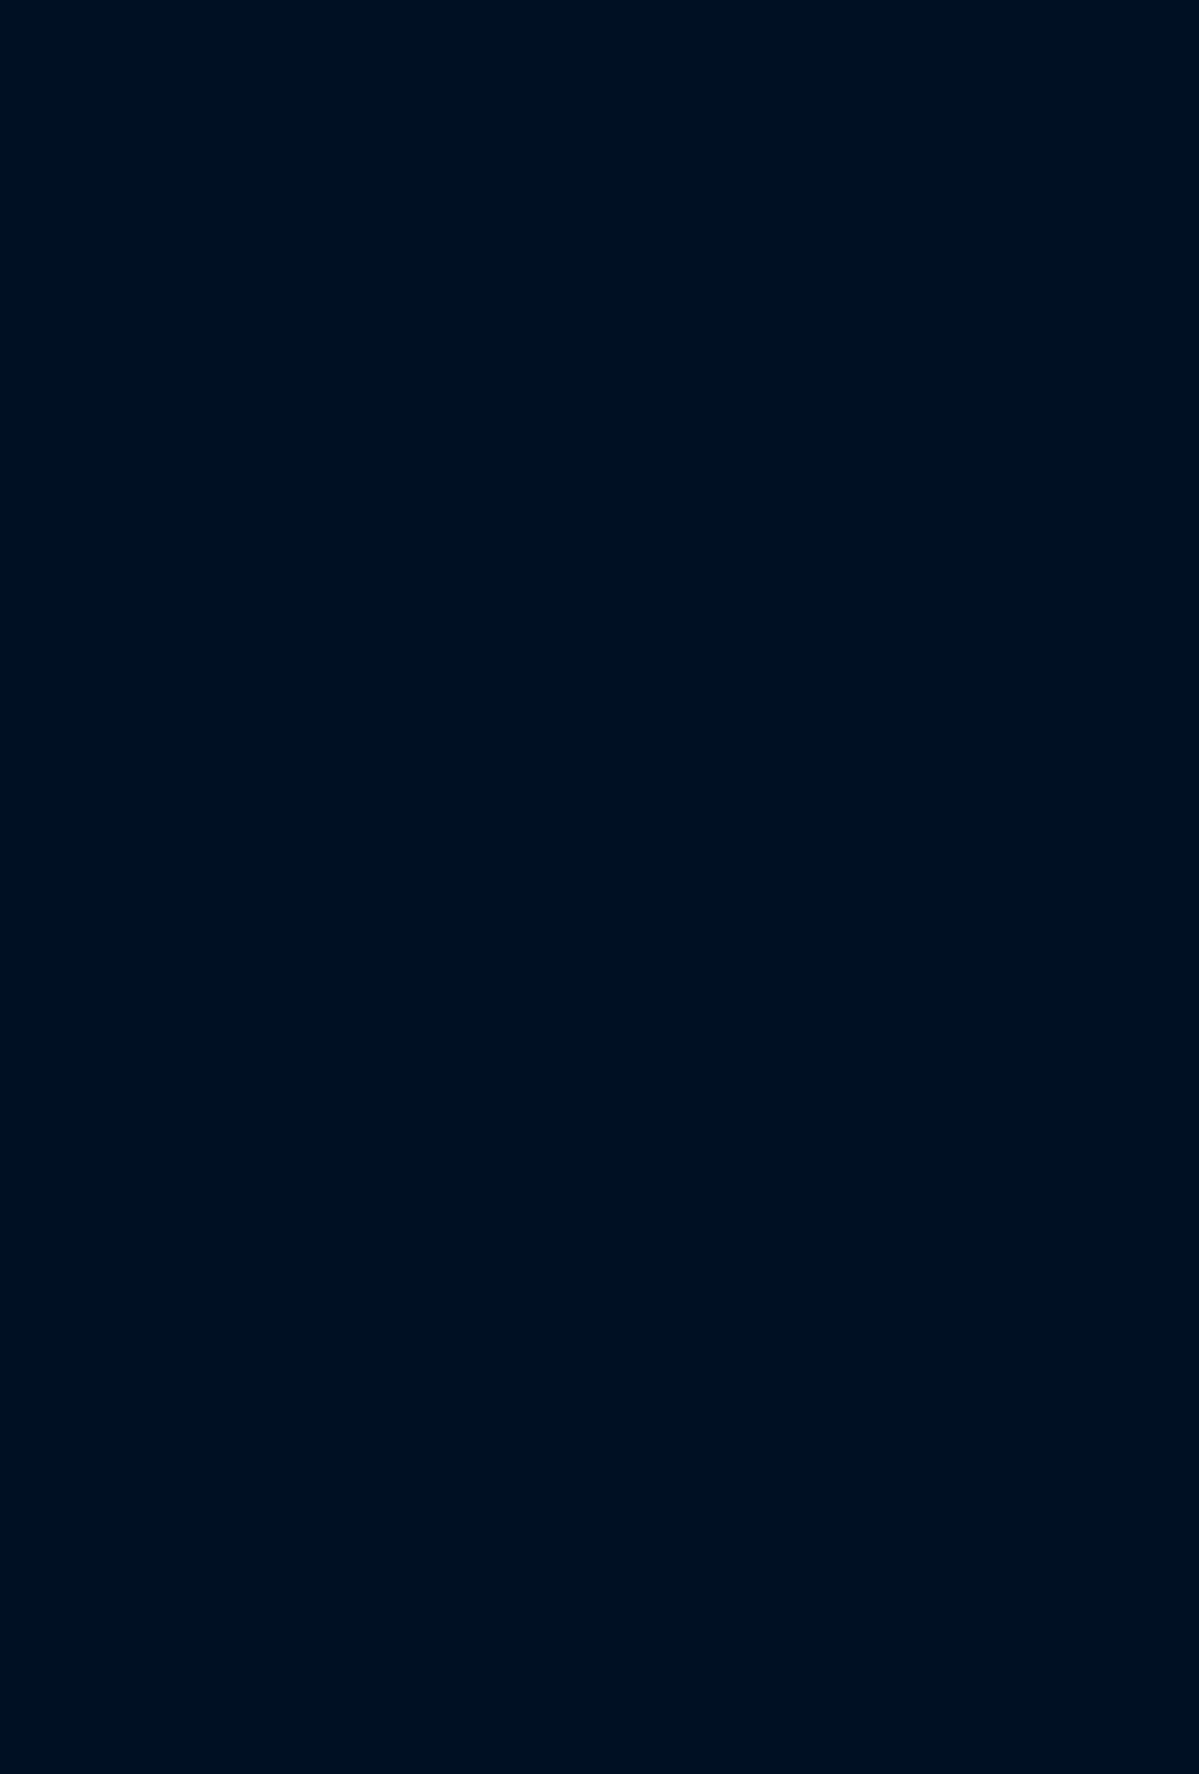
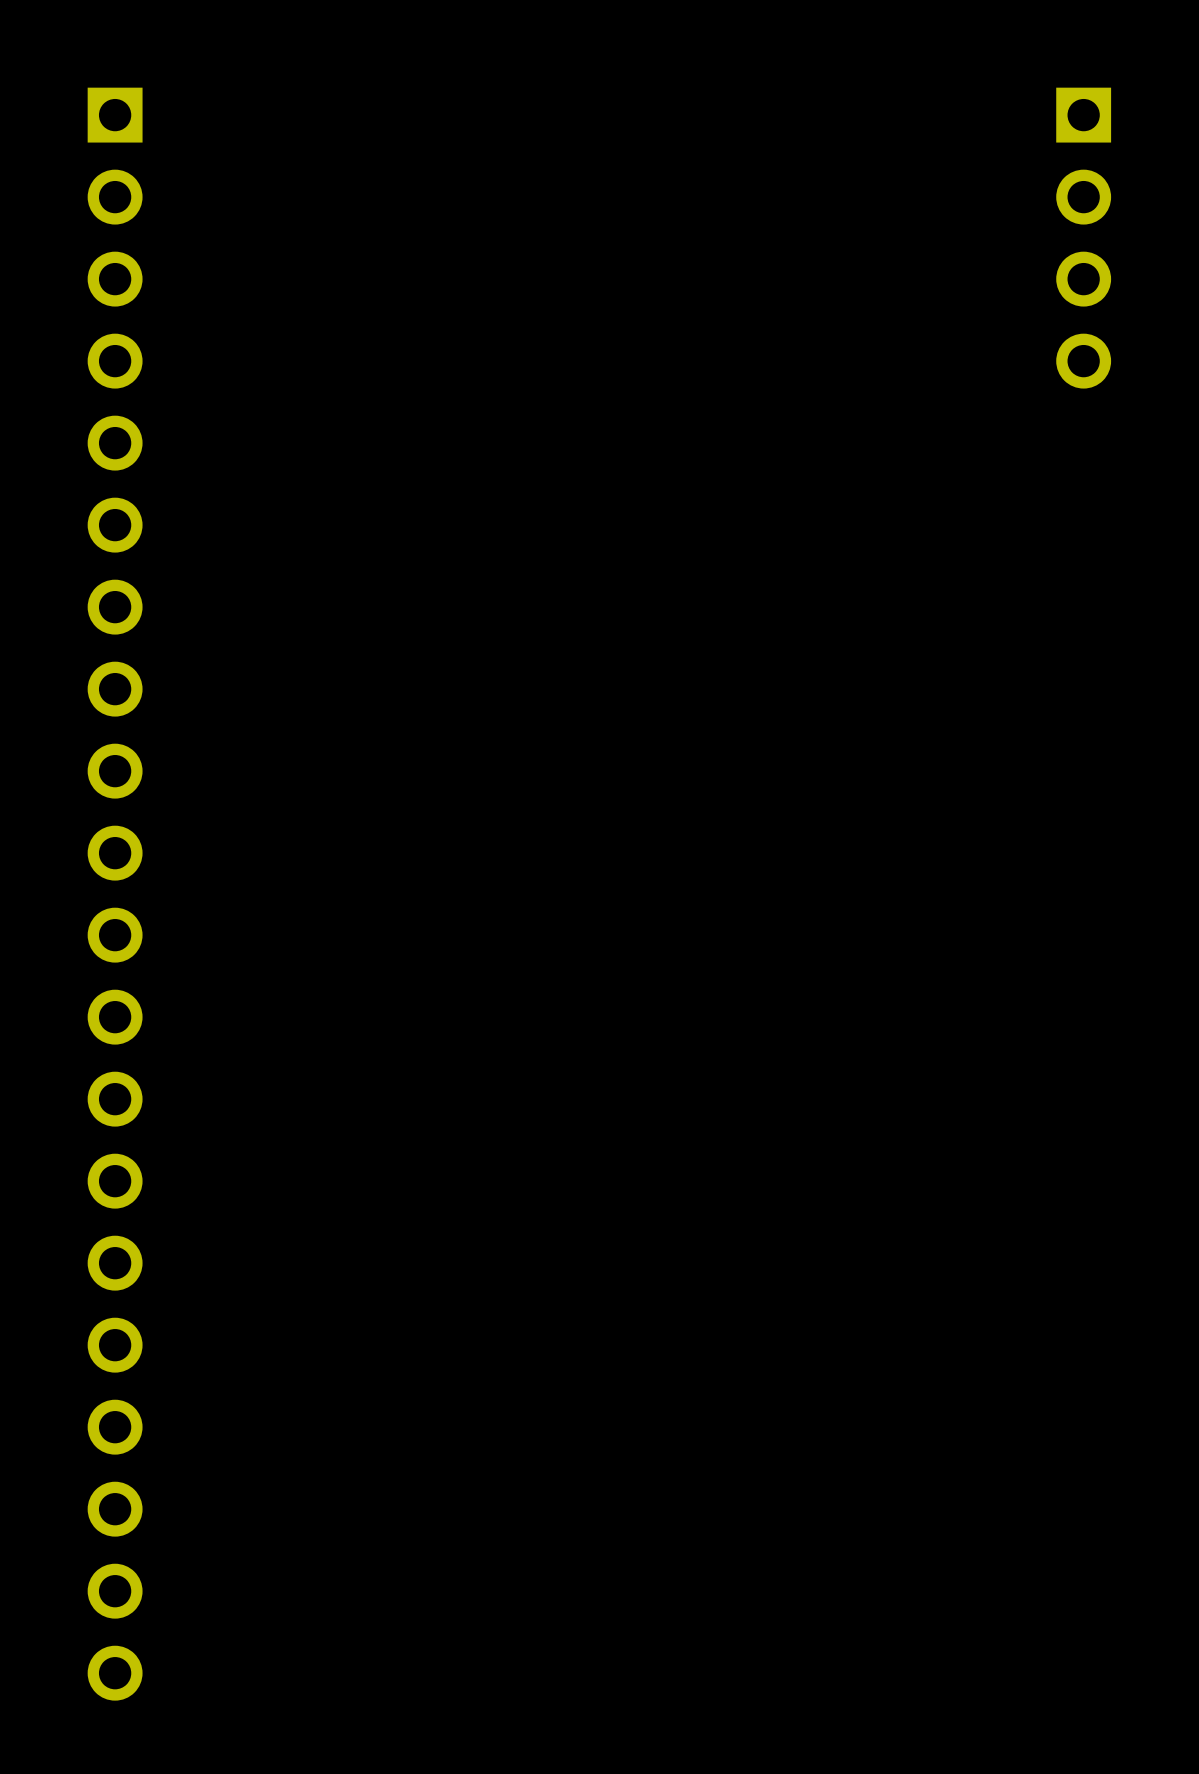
part: none -> (1083, 238)
part: none -> (115, 894)

